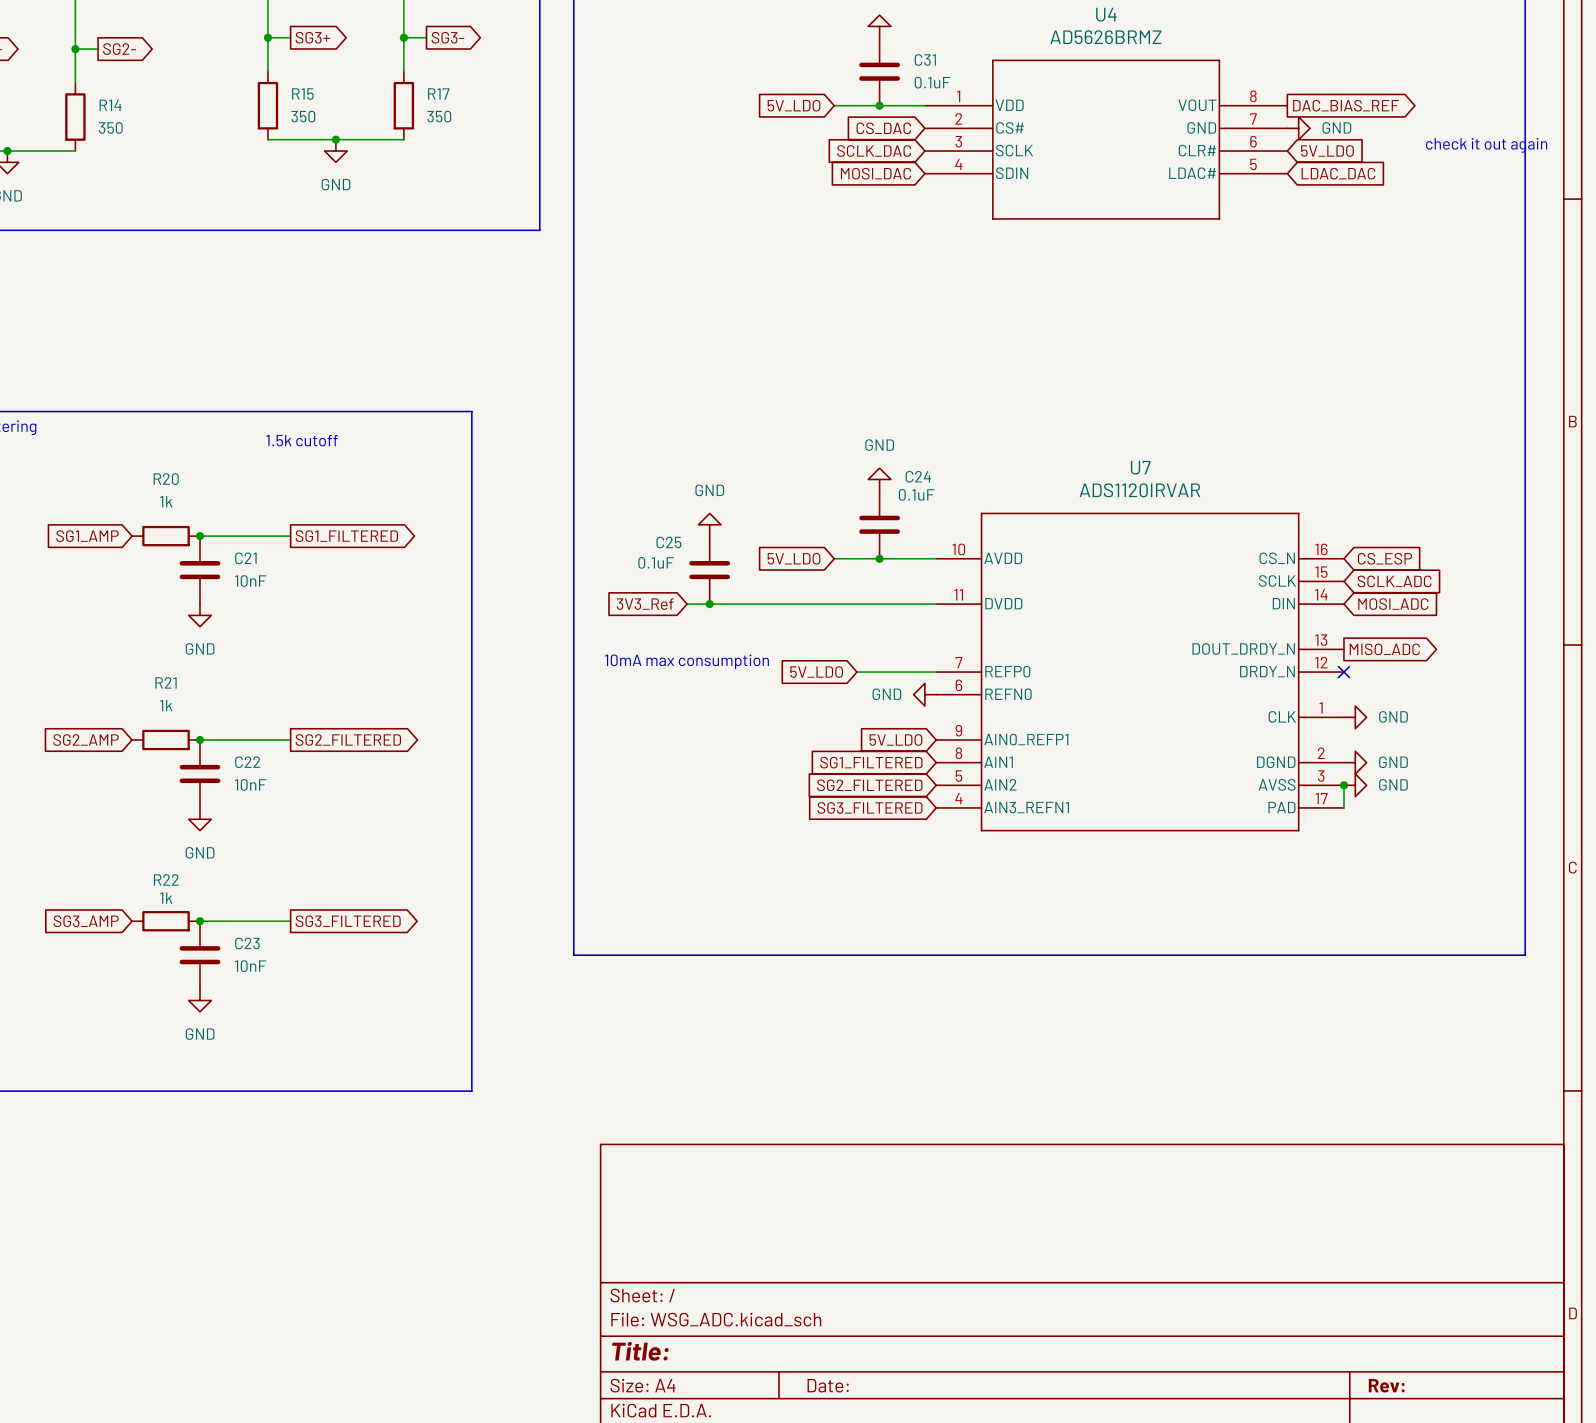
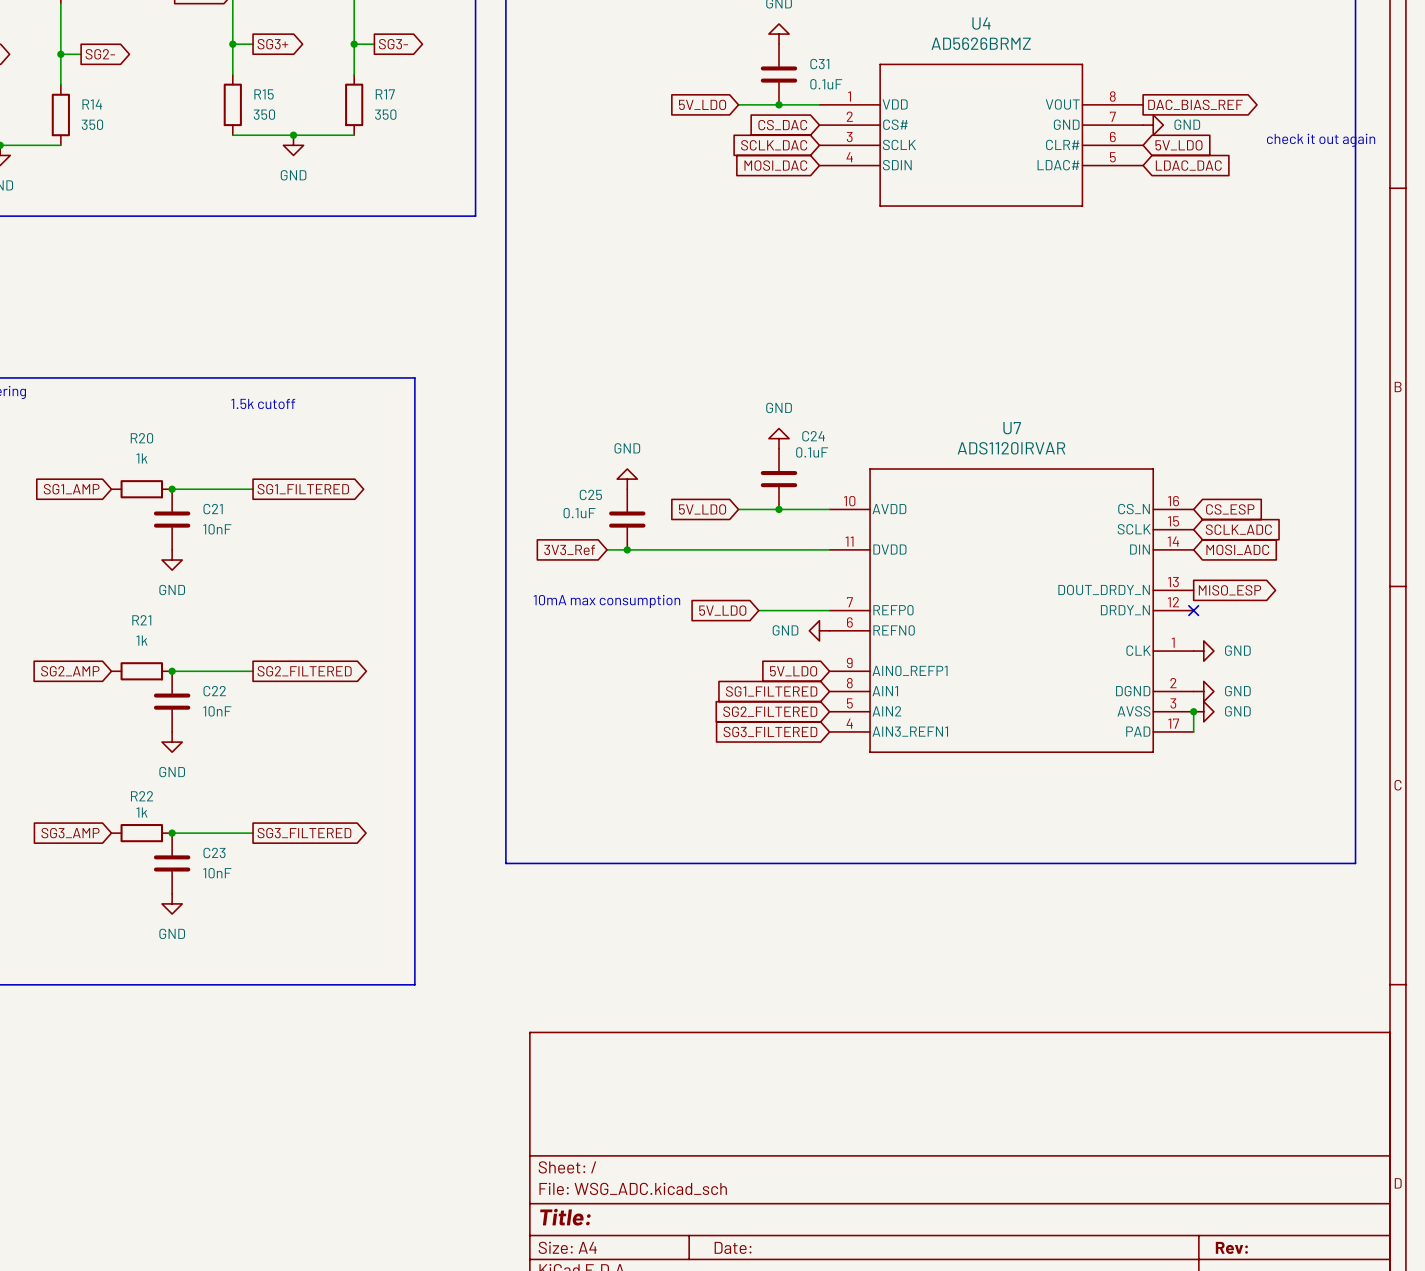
global label: MISO_ADC (1384, 649) -> MISO_ESP (1230, 590)

